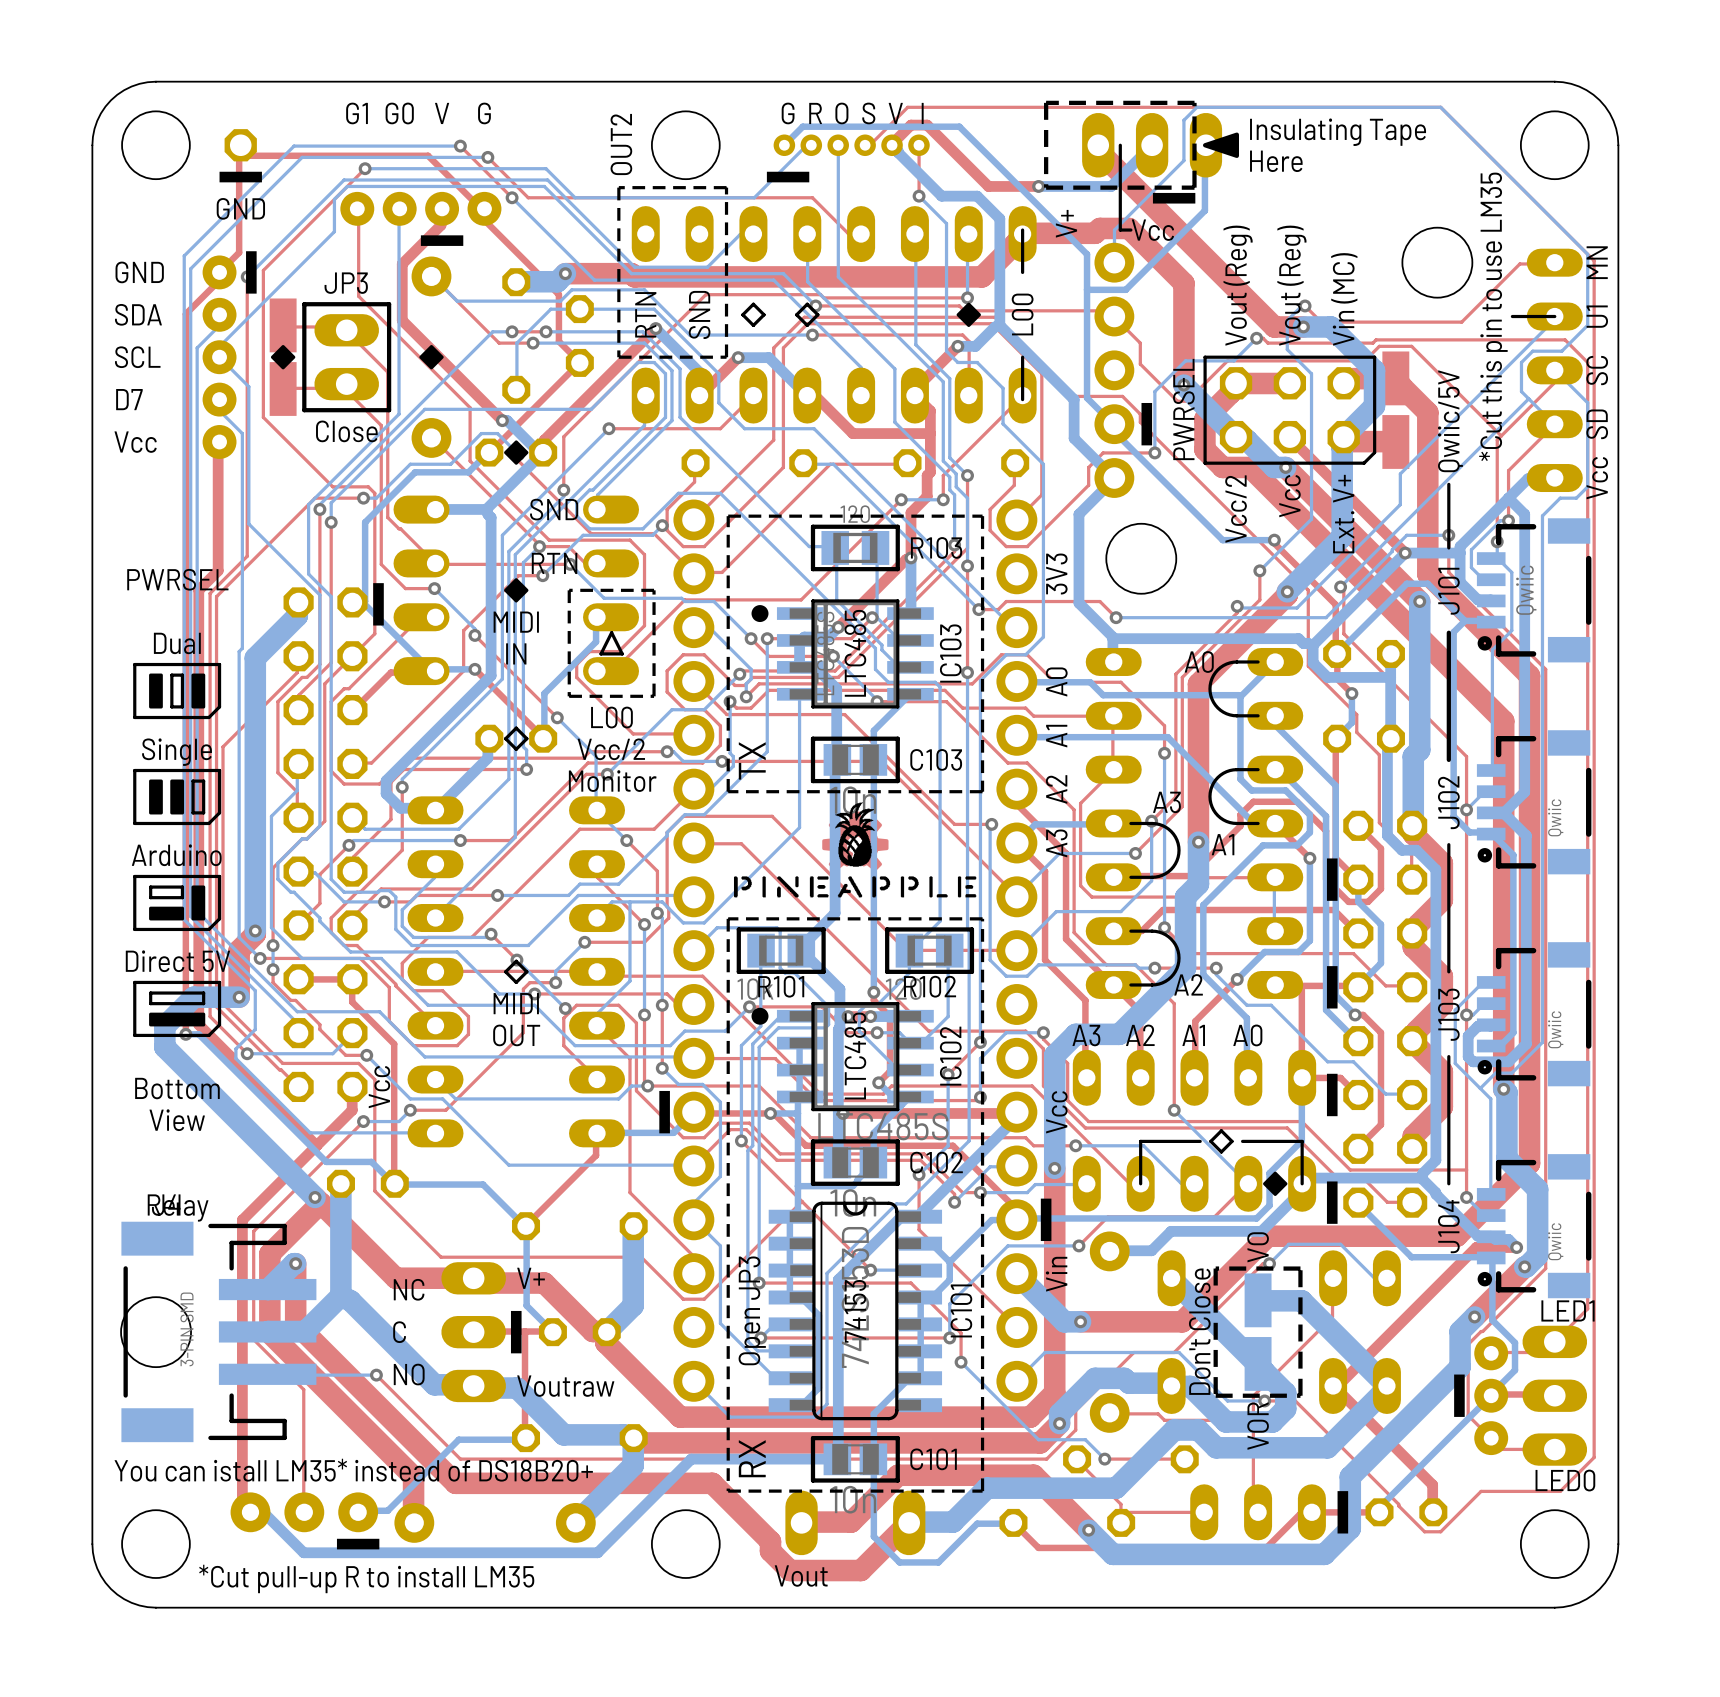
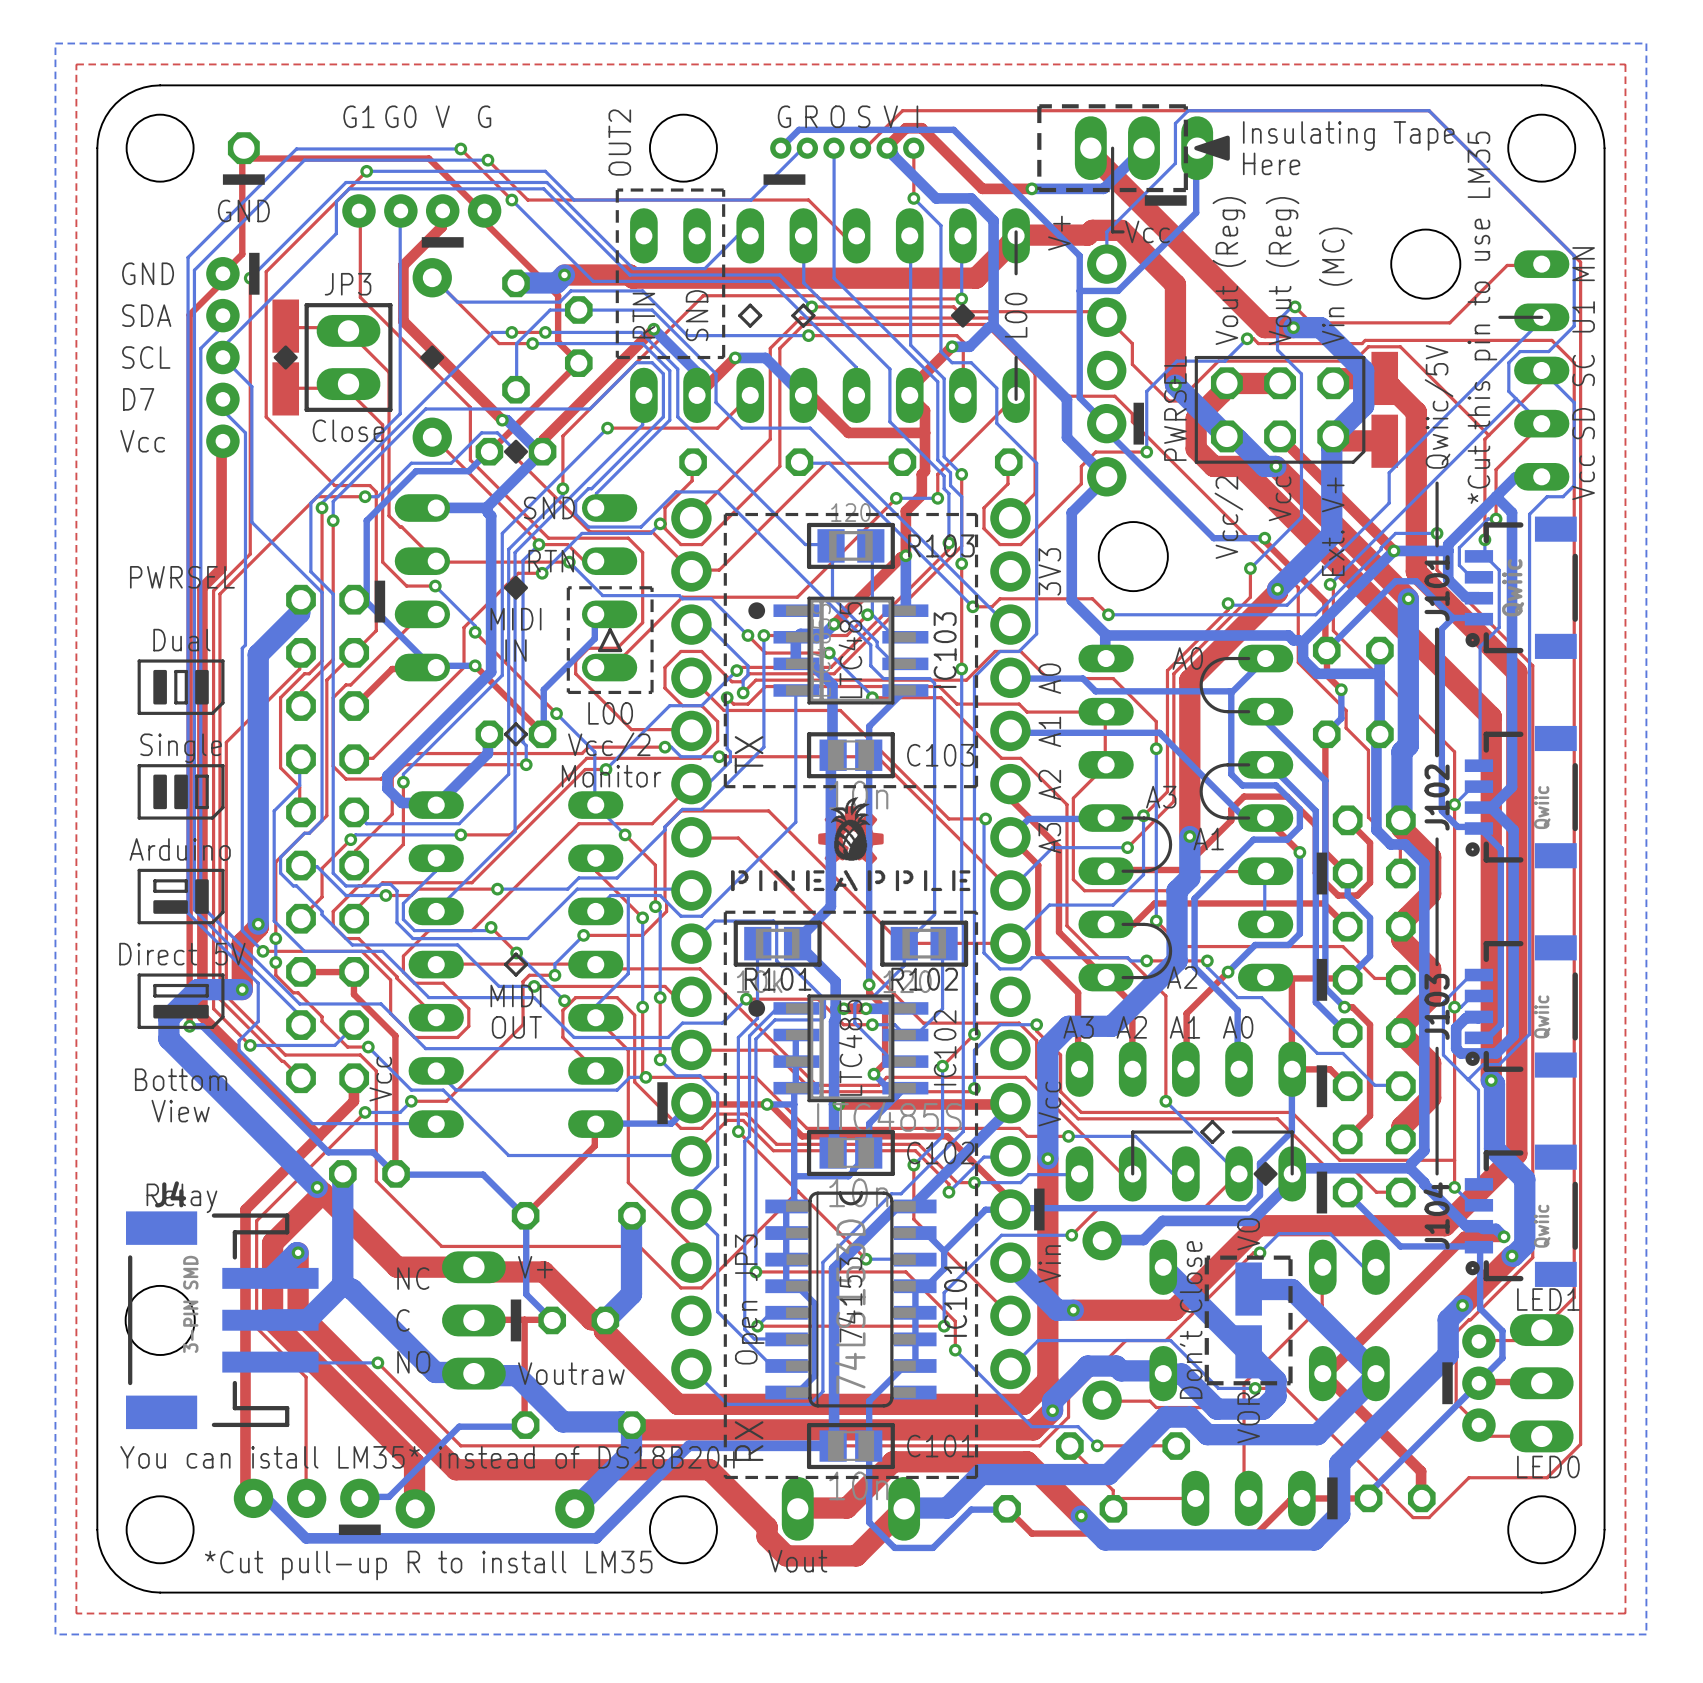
bottom zone outline: none -> (1646, 43) (55, 43) (55, 1634) (1646, 1634) (1646, 43)
top zone outline: none -> (1625, 64) (76, 64) (76, 1613) (1625, 1613) (1625, 64)

